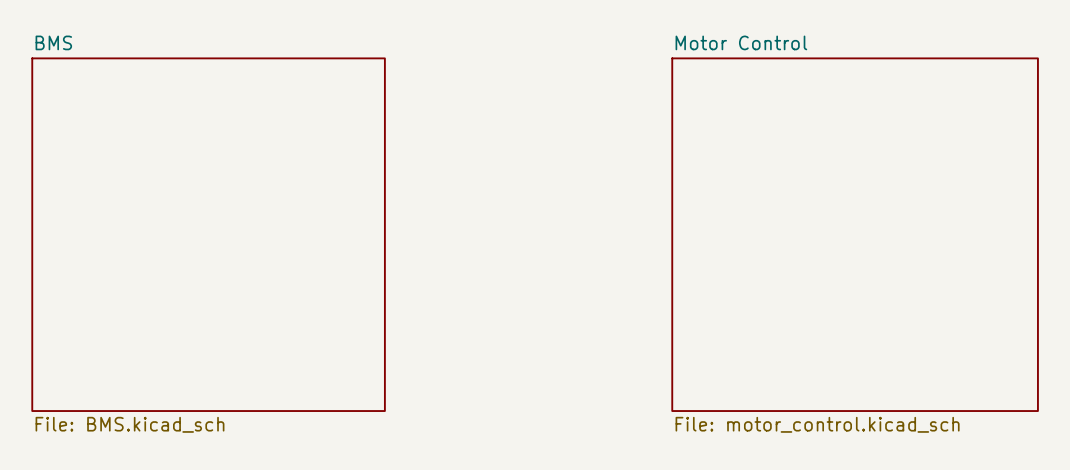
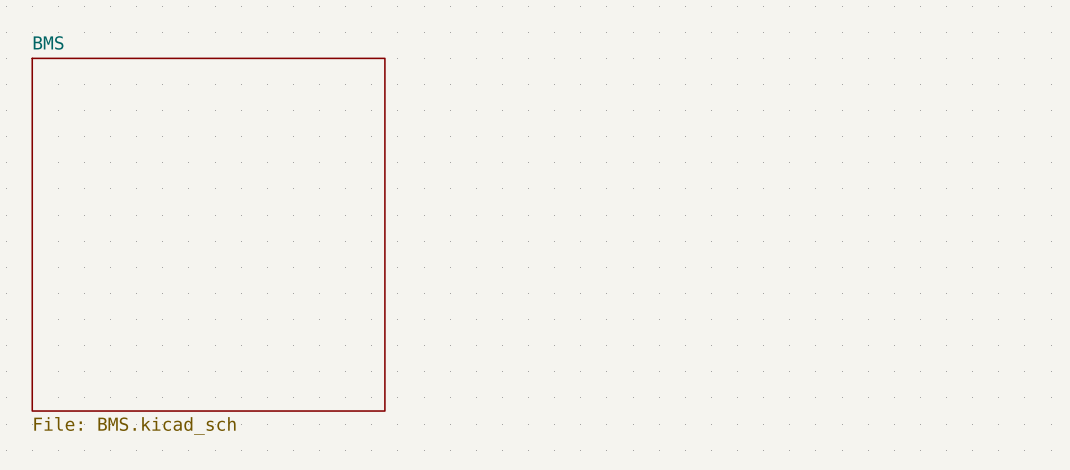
sheet Motor Control: File: motor_control.kicad_sch (855, 234) -> none

